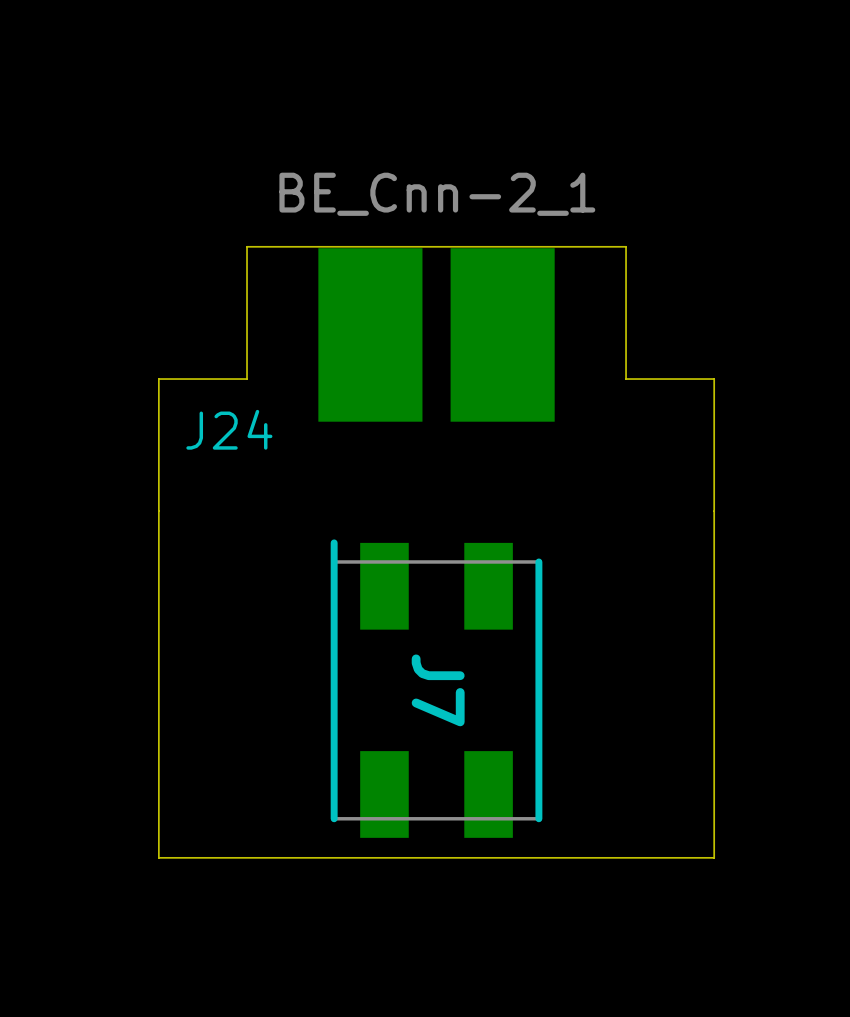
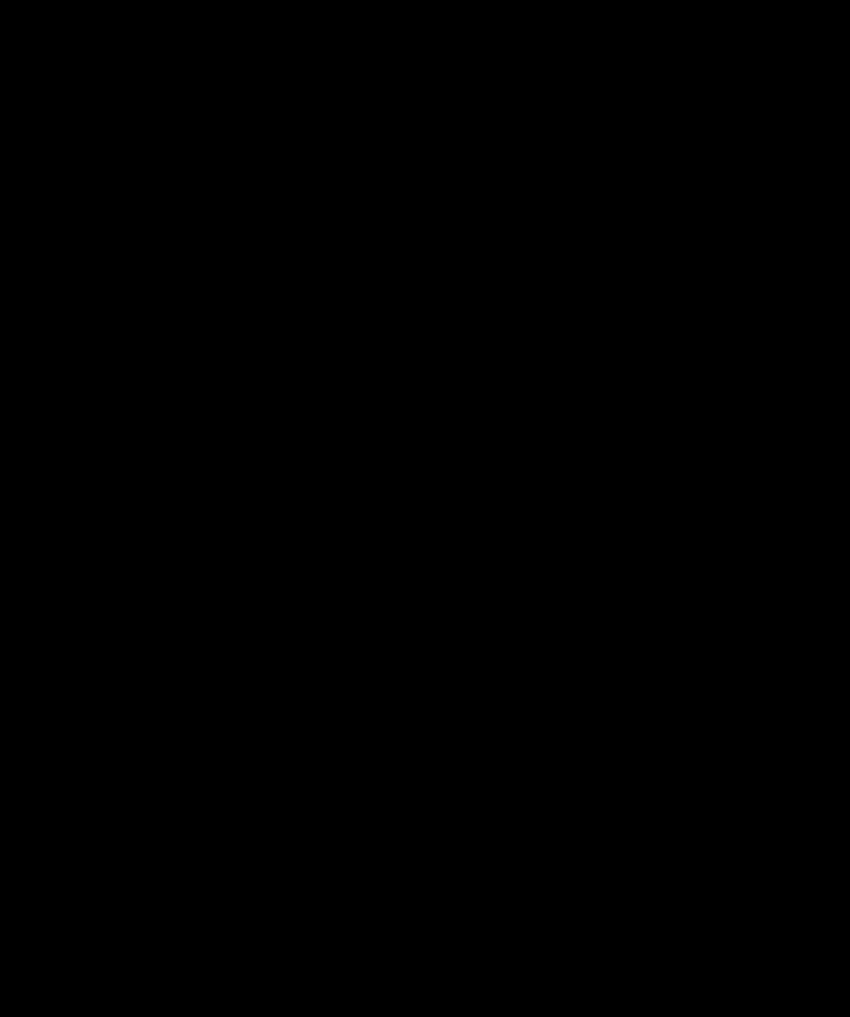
J24: BE_Cnn-2_1 (436, 379) -> none
board edge: (714, 511) (714, 857) (158, 857) (158, 511) -> none
J7: (436, 688) -> none

